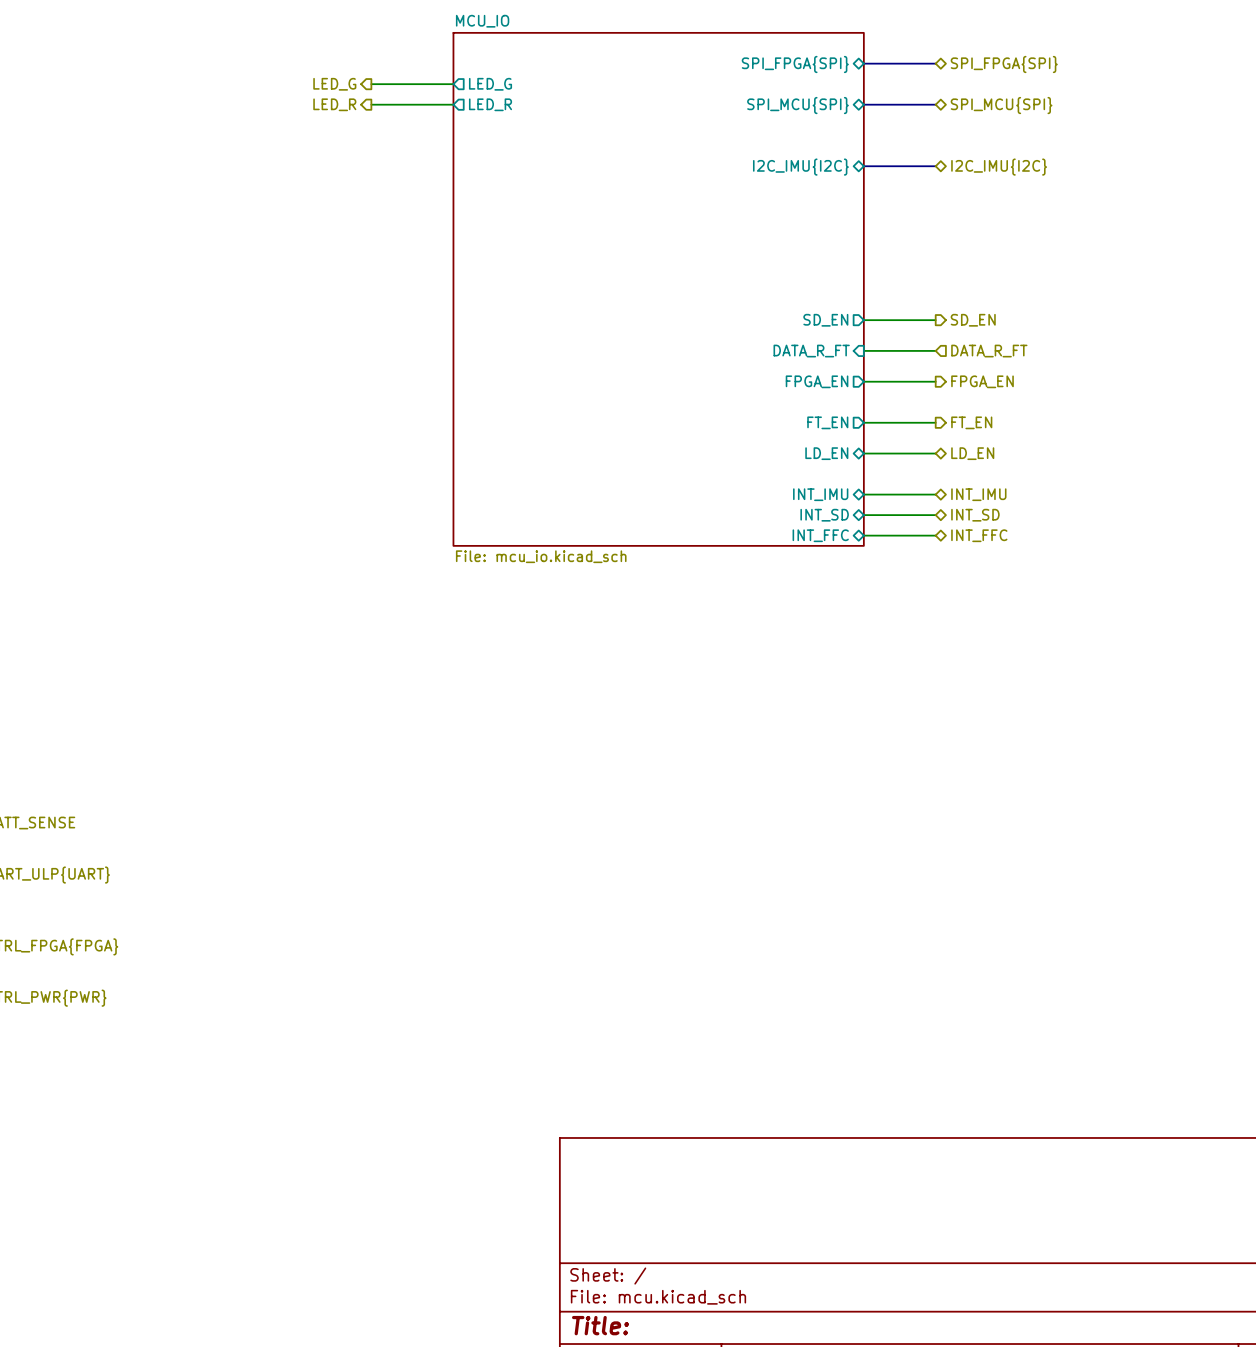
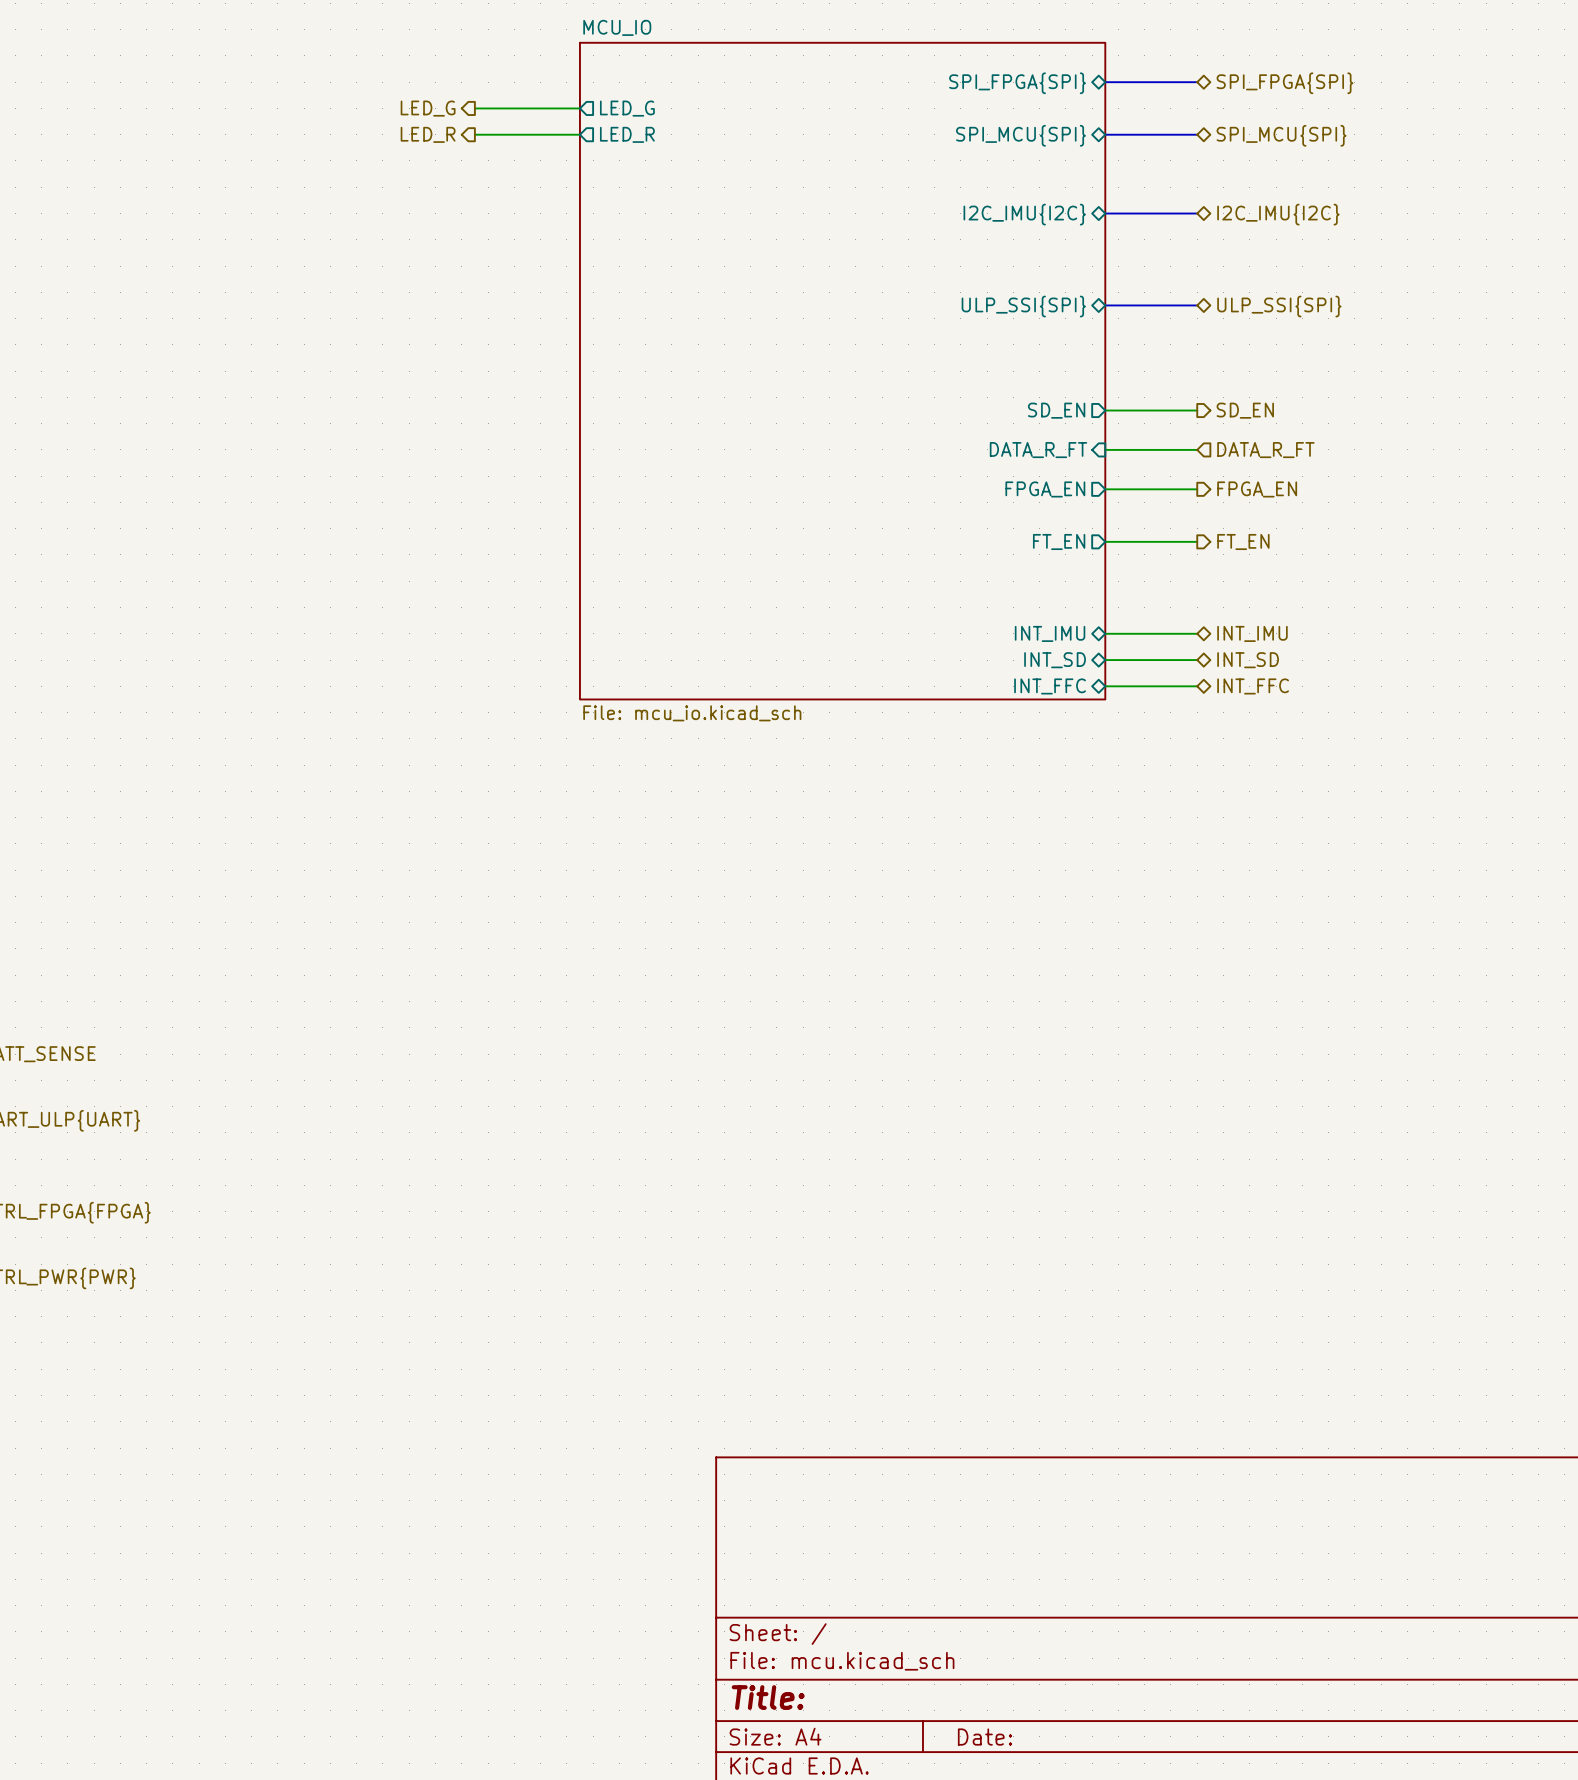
sheet pin: none -> ULP_SSI{SPI} (1023, 306)
bus: none -> (1105, 305) (1197, 305)
hierarchical label: none -> ULP_SSI{SPI} (1279, 306)
sheet pin: LD_EN (826, 453) -> none
wire: (863, 453) (935, 453) -> none
hierarchical label: LD_EN (972, 453) -> none

